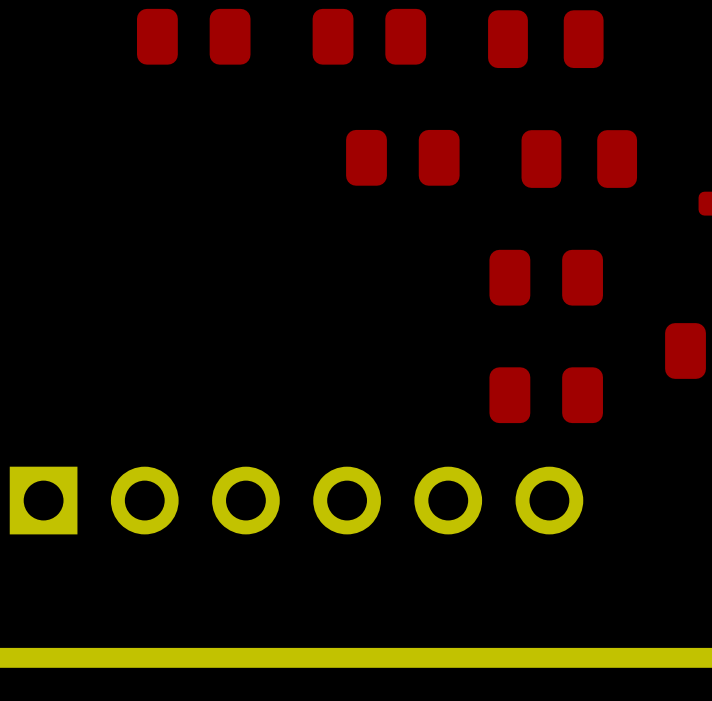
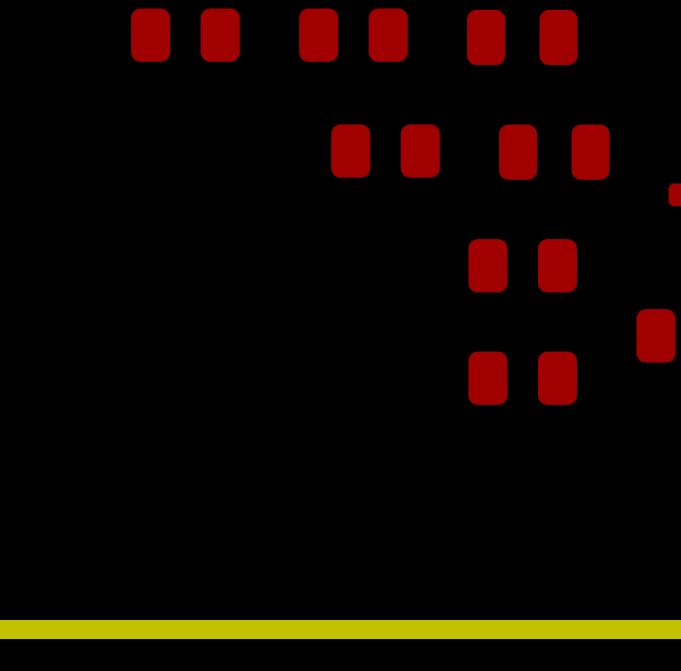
part: (296, 500) -> none

